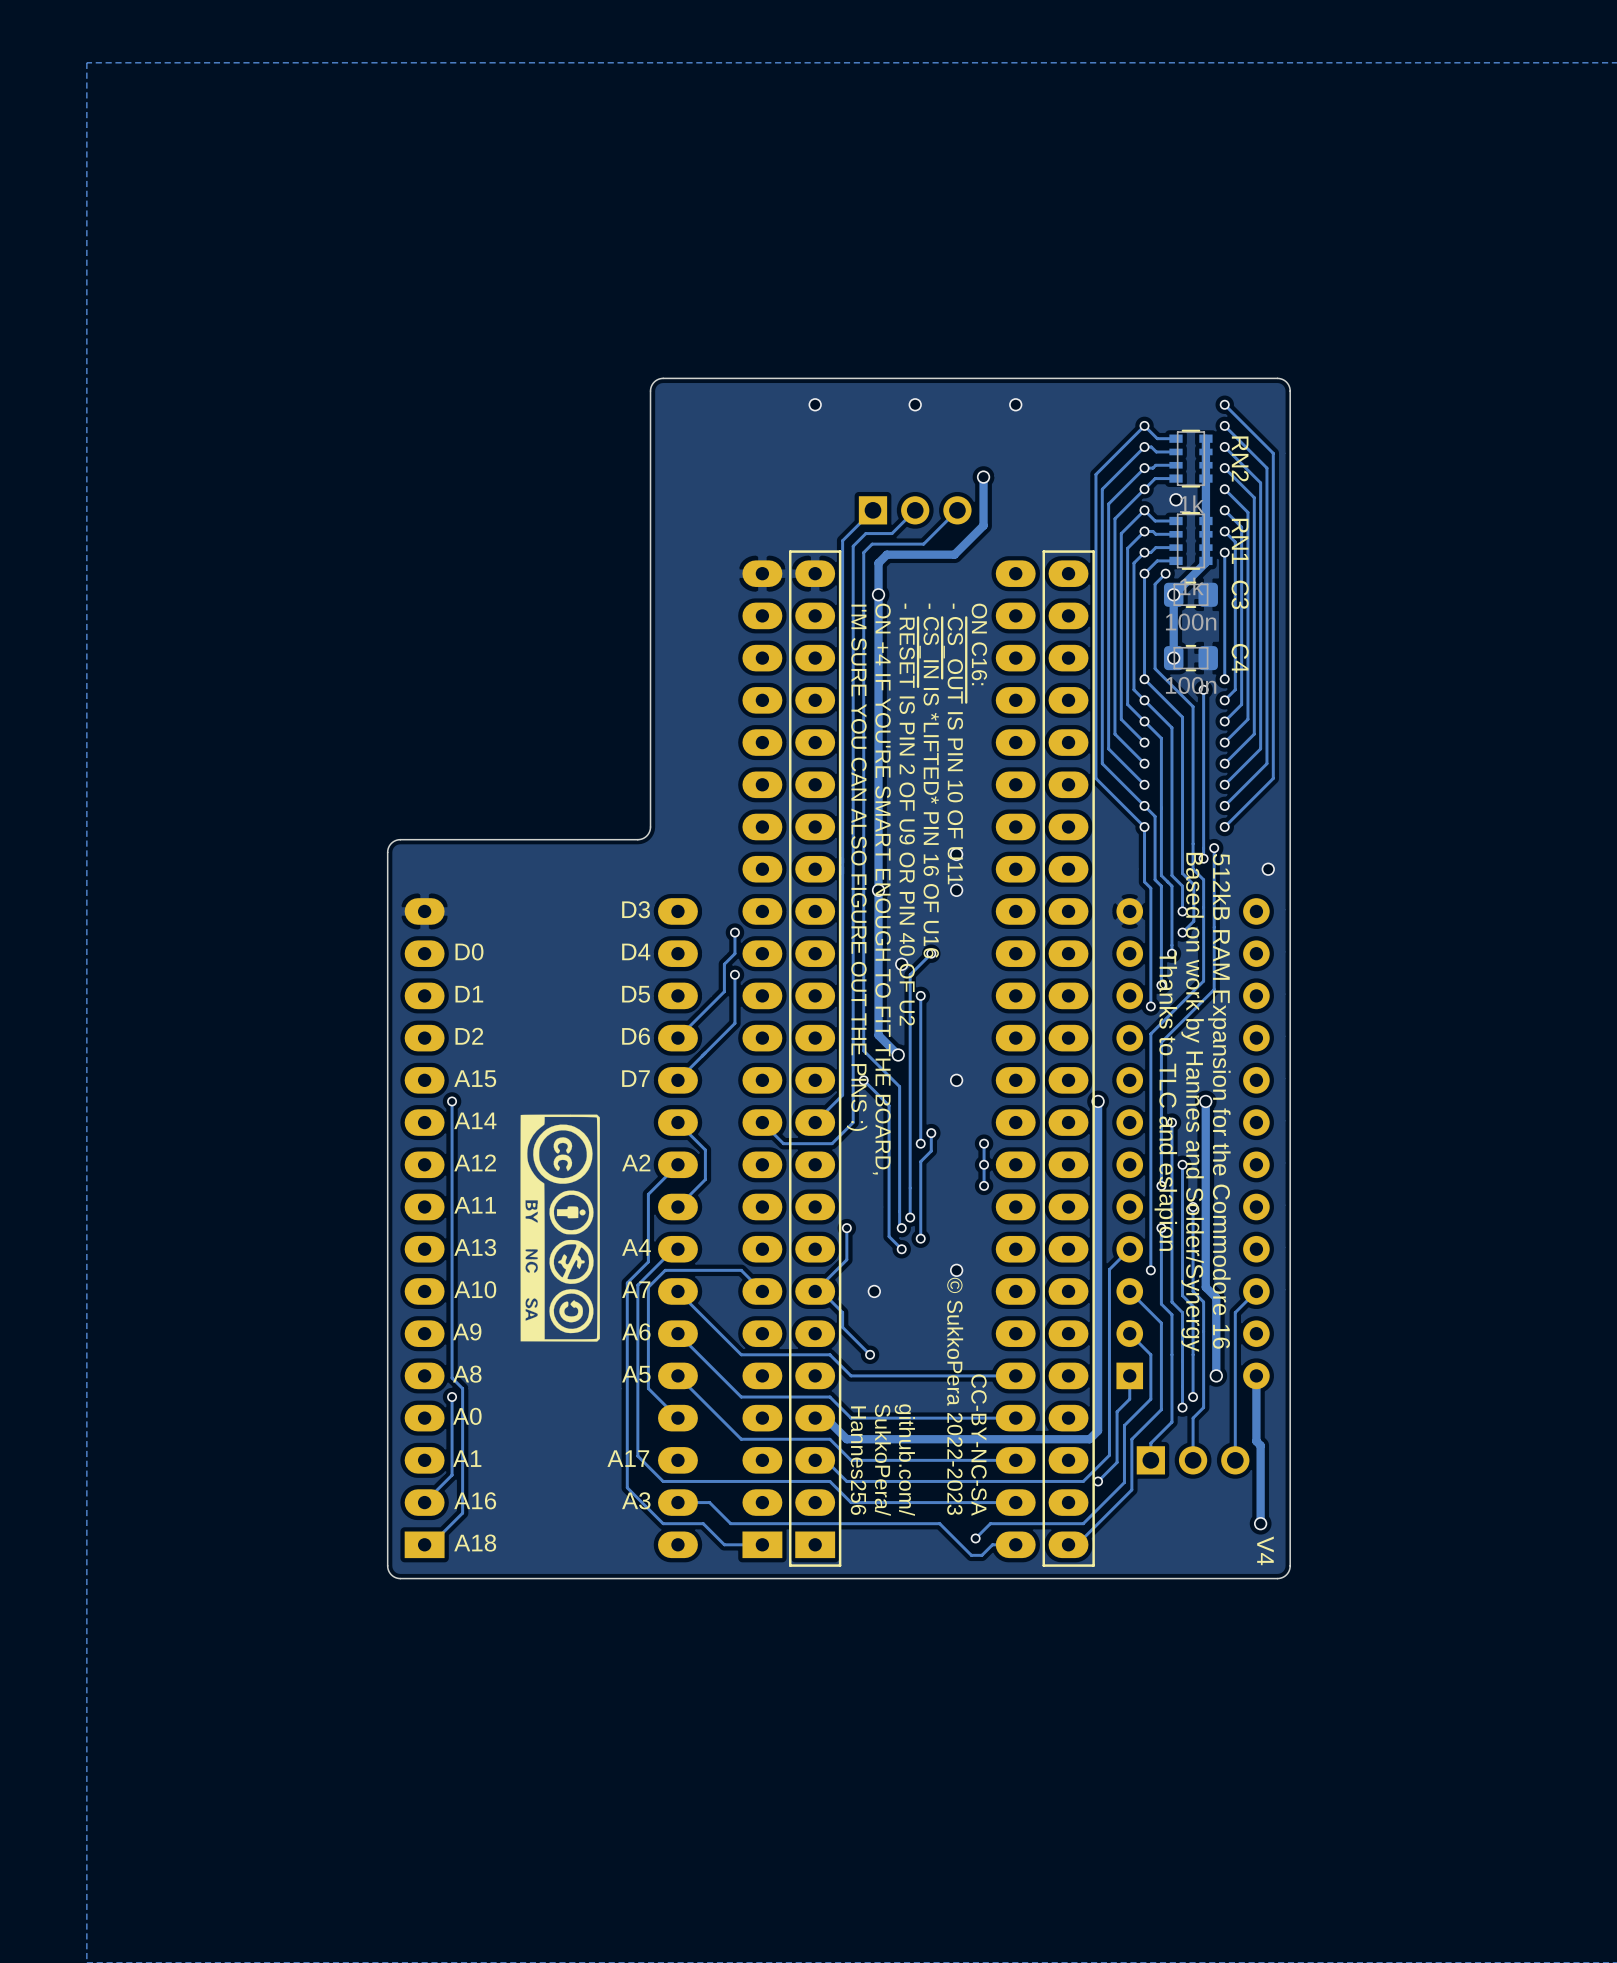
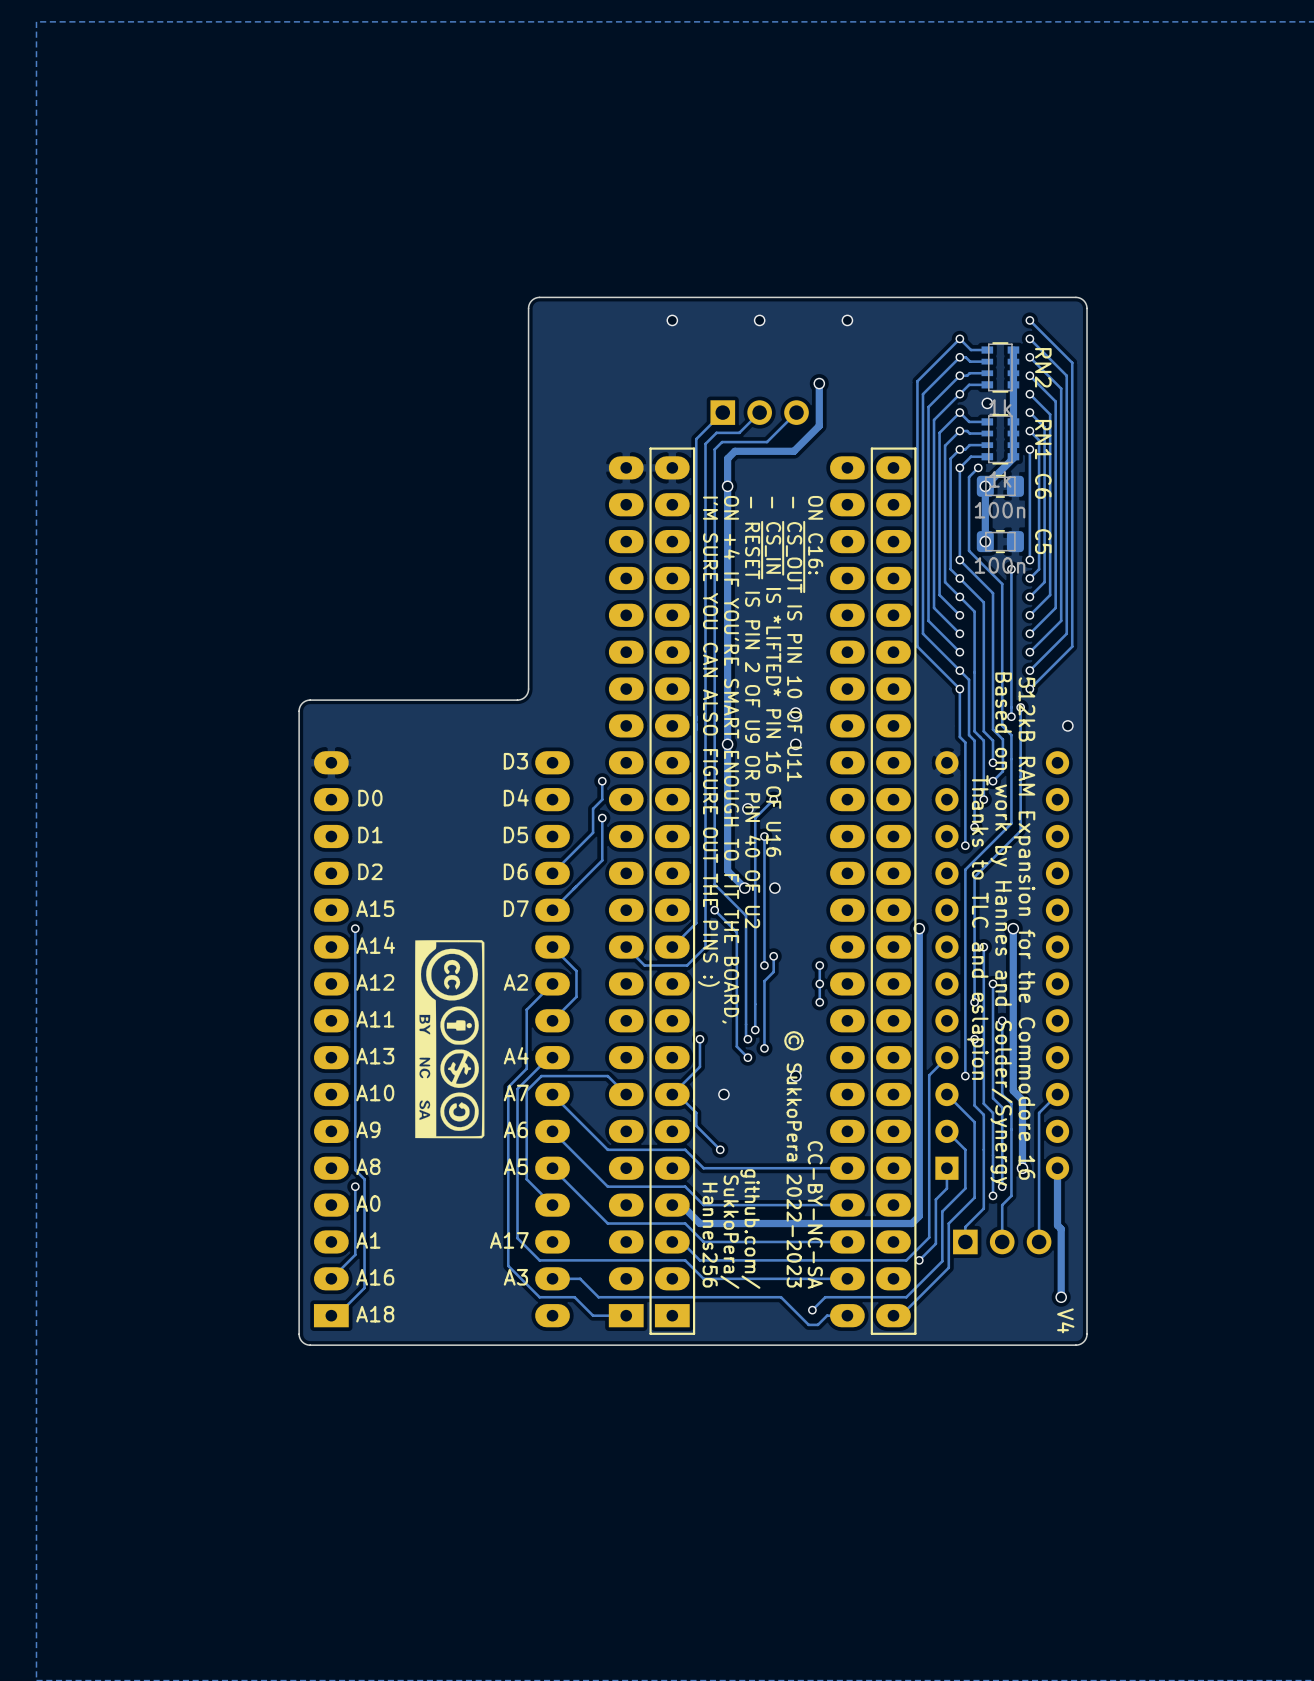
C3 name: C3 (1240, 594) -> C6 (1043, 486)
C4 name: C4 (1240, 658) -> C5 (1043, 541)
via position: (956, 1080) -> (774, 888)

